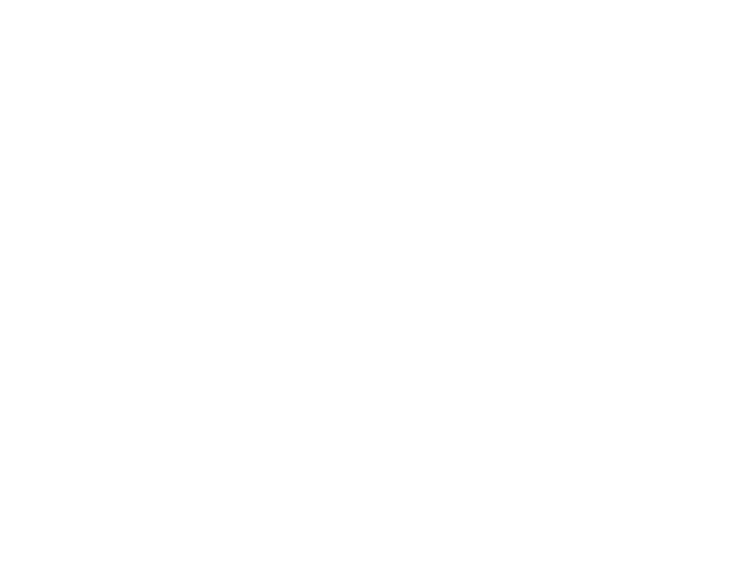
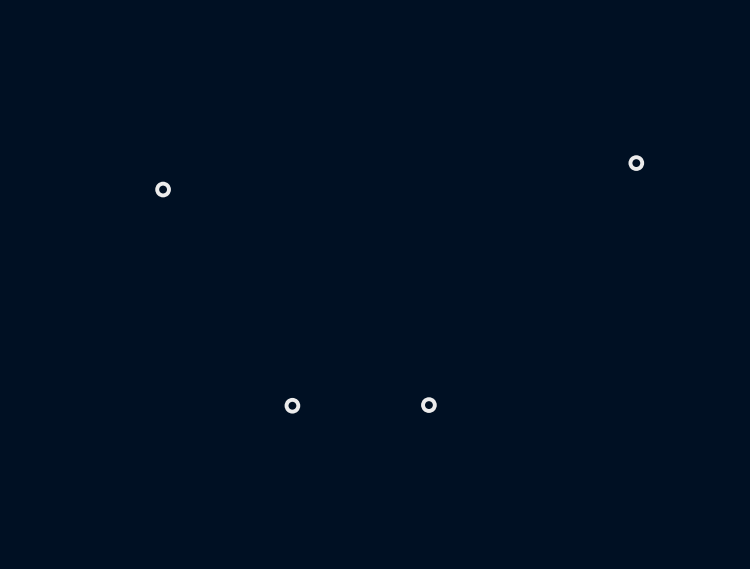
via: none -> (636, 163)
via: none -> (163, 189)
via: none -> (292, 405)
via: none -> (428, 405)

